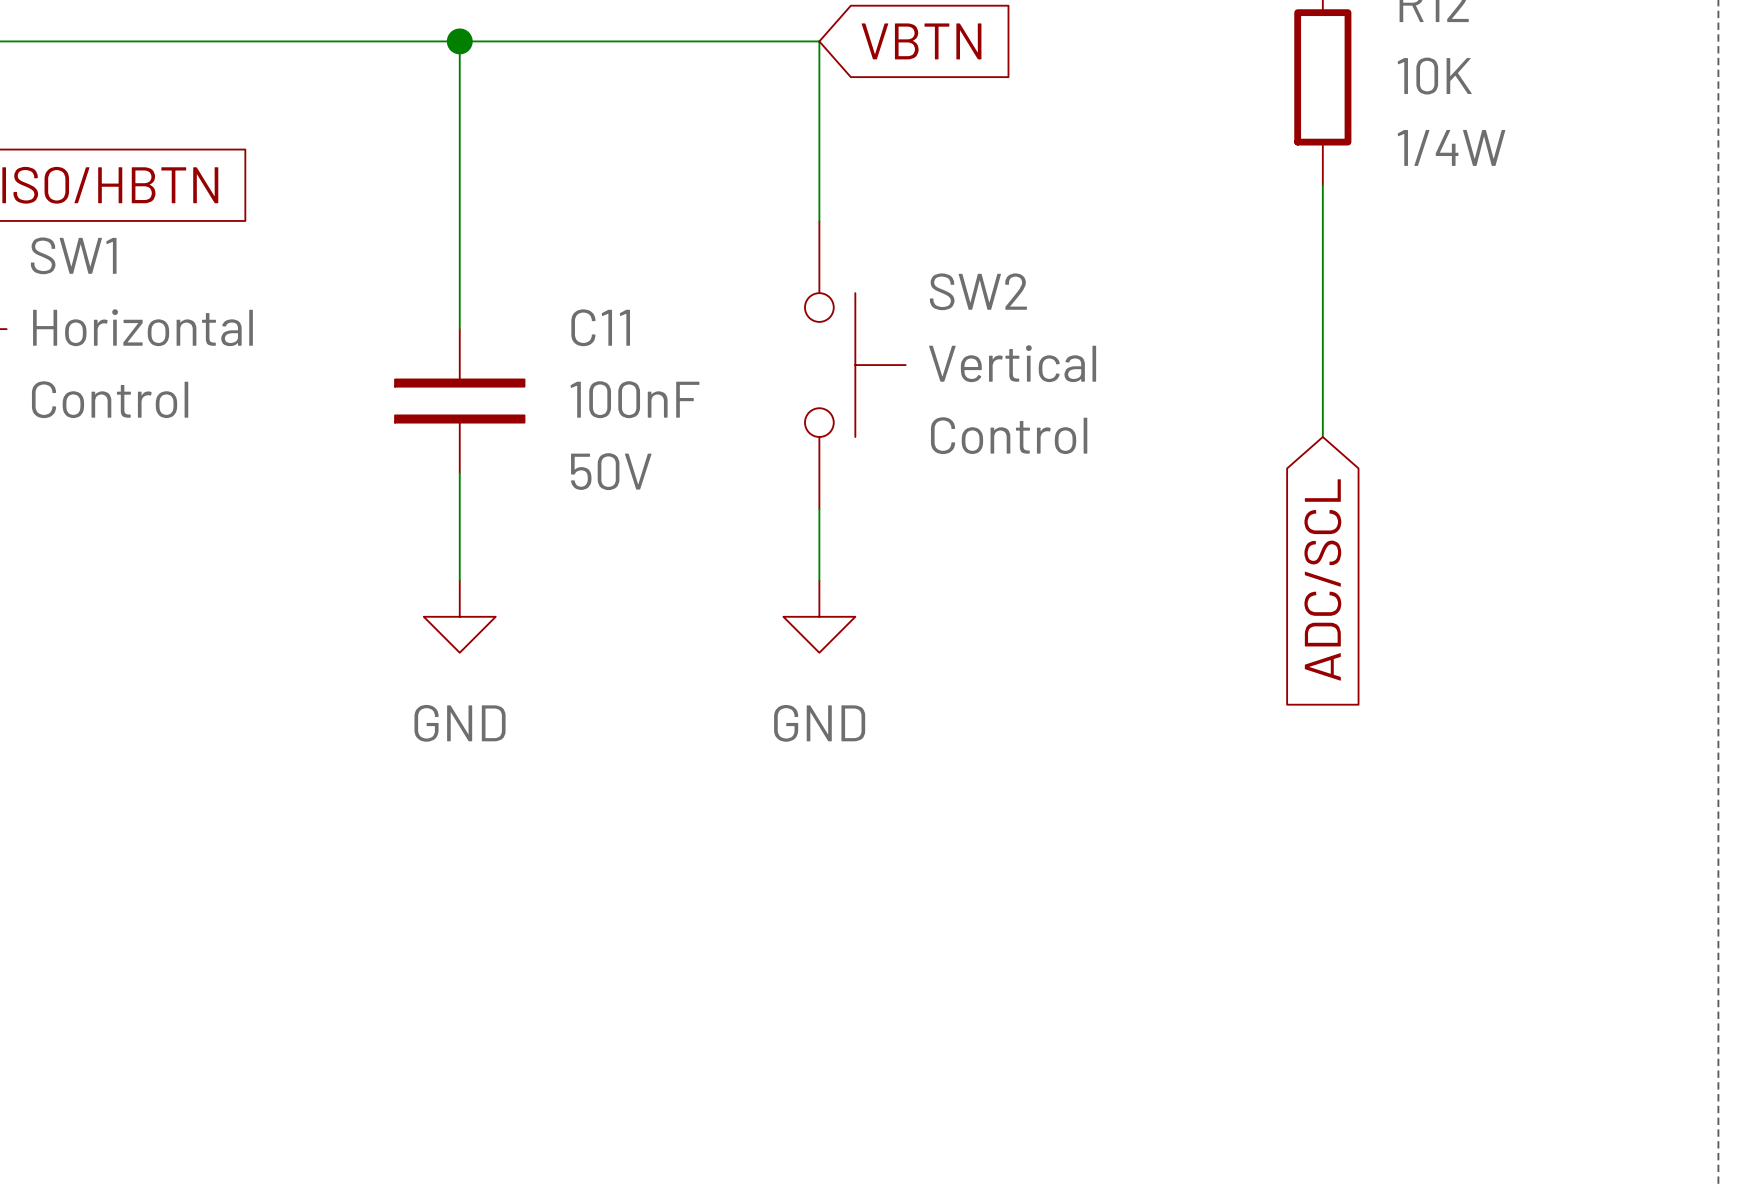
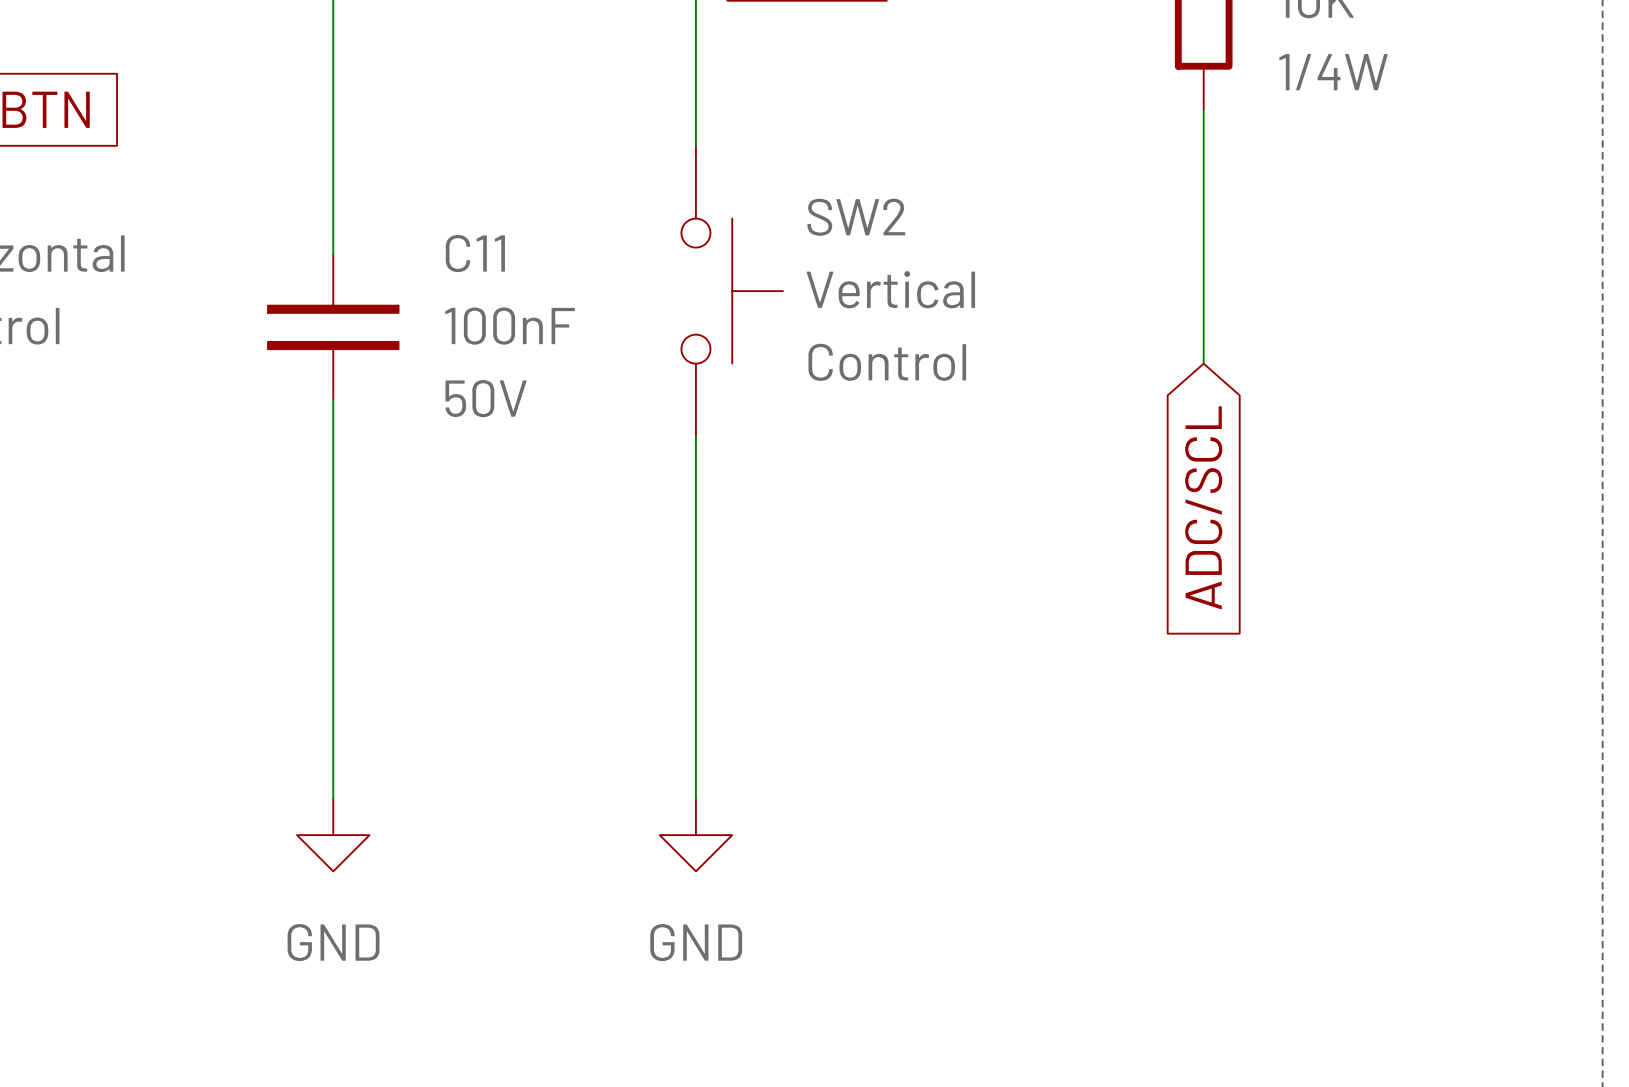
wire: none -> (333, 508) (333, 798)
wire: none -> (695, 508) (695, 798)
power symbol: GND (459, 616) -> none
power symbol: GND (819, 616) -> none
power symbol: none -> GND (333, 835)
power symbol: none -> GND (695, 835)

